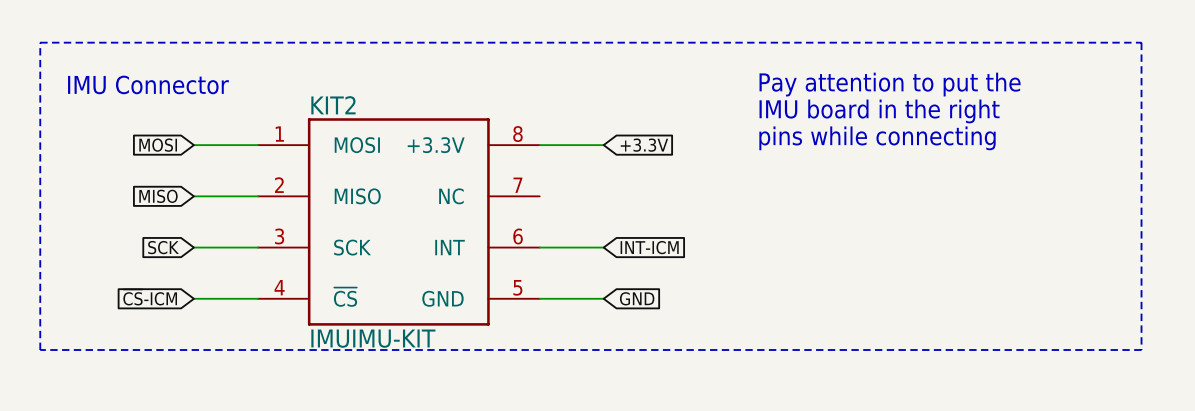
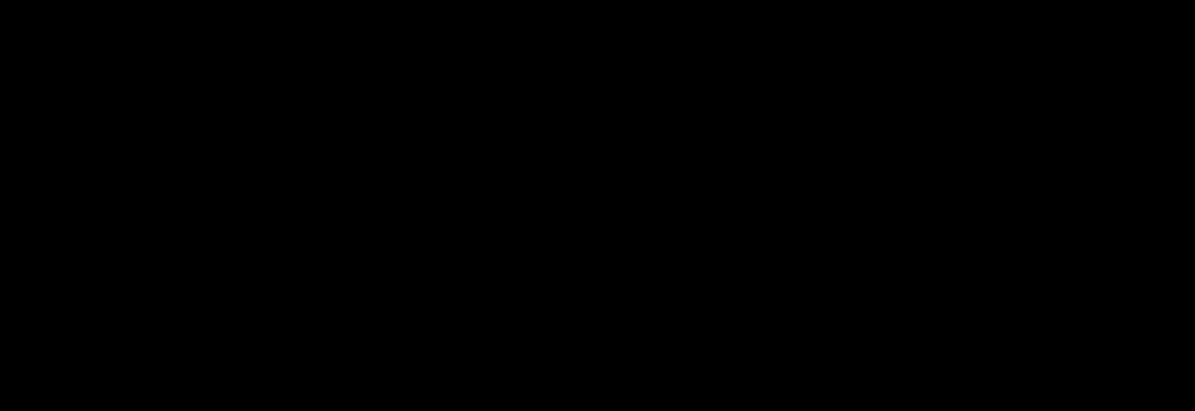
line: (40, 42) (1141, 42) (1141, 350) (40, 350) (40, 42) -> none
text: IMU Connector (148, 84) -> none
text: Pay attention to put the (890, 84) -> none
text: IMU board in the right (879, 111) -> none
text: pins while connecting (877, 138) -> none
global label: MOSI (158, 145) -> none
wire: (193, 145) (257, 145) -> none
wire: (539, 145) (603, 145) -> none
global label: +3.3V (644, 145) -> none
global label: MISO (158, 196) -> none
wire: (193, 196) (257, 196) -> none
KIT2: IMUIMU-KIT (398, 221) -> none
global label: SCK (163, 247) -> none
wire: (193, 247) (257, 247) -> none
wire: (539, 247) (603, 247) -> none
global label: INT-ICM (649, 247) -> none
global label: ~{CS}-ICM (150, 297) -> none
wire: (193, 298) (257, 298) -> none
wire: (539, 298) (603, 298) -> none
global label: GND (637, 298) -> none

